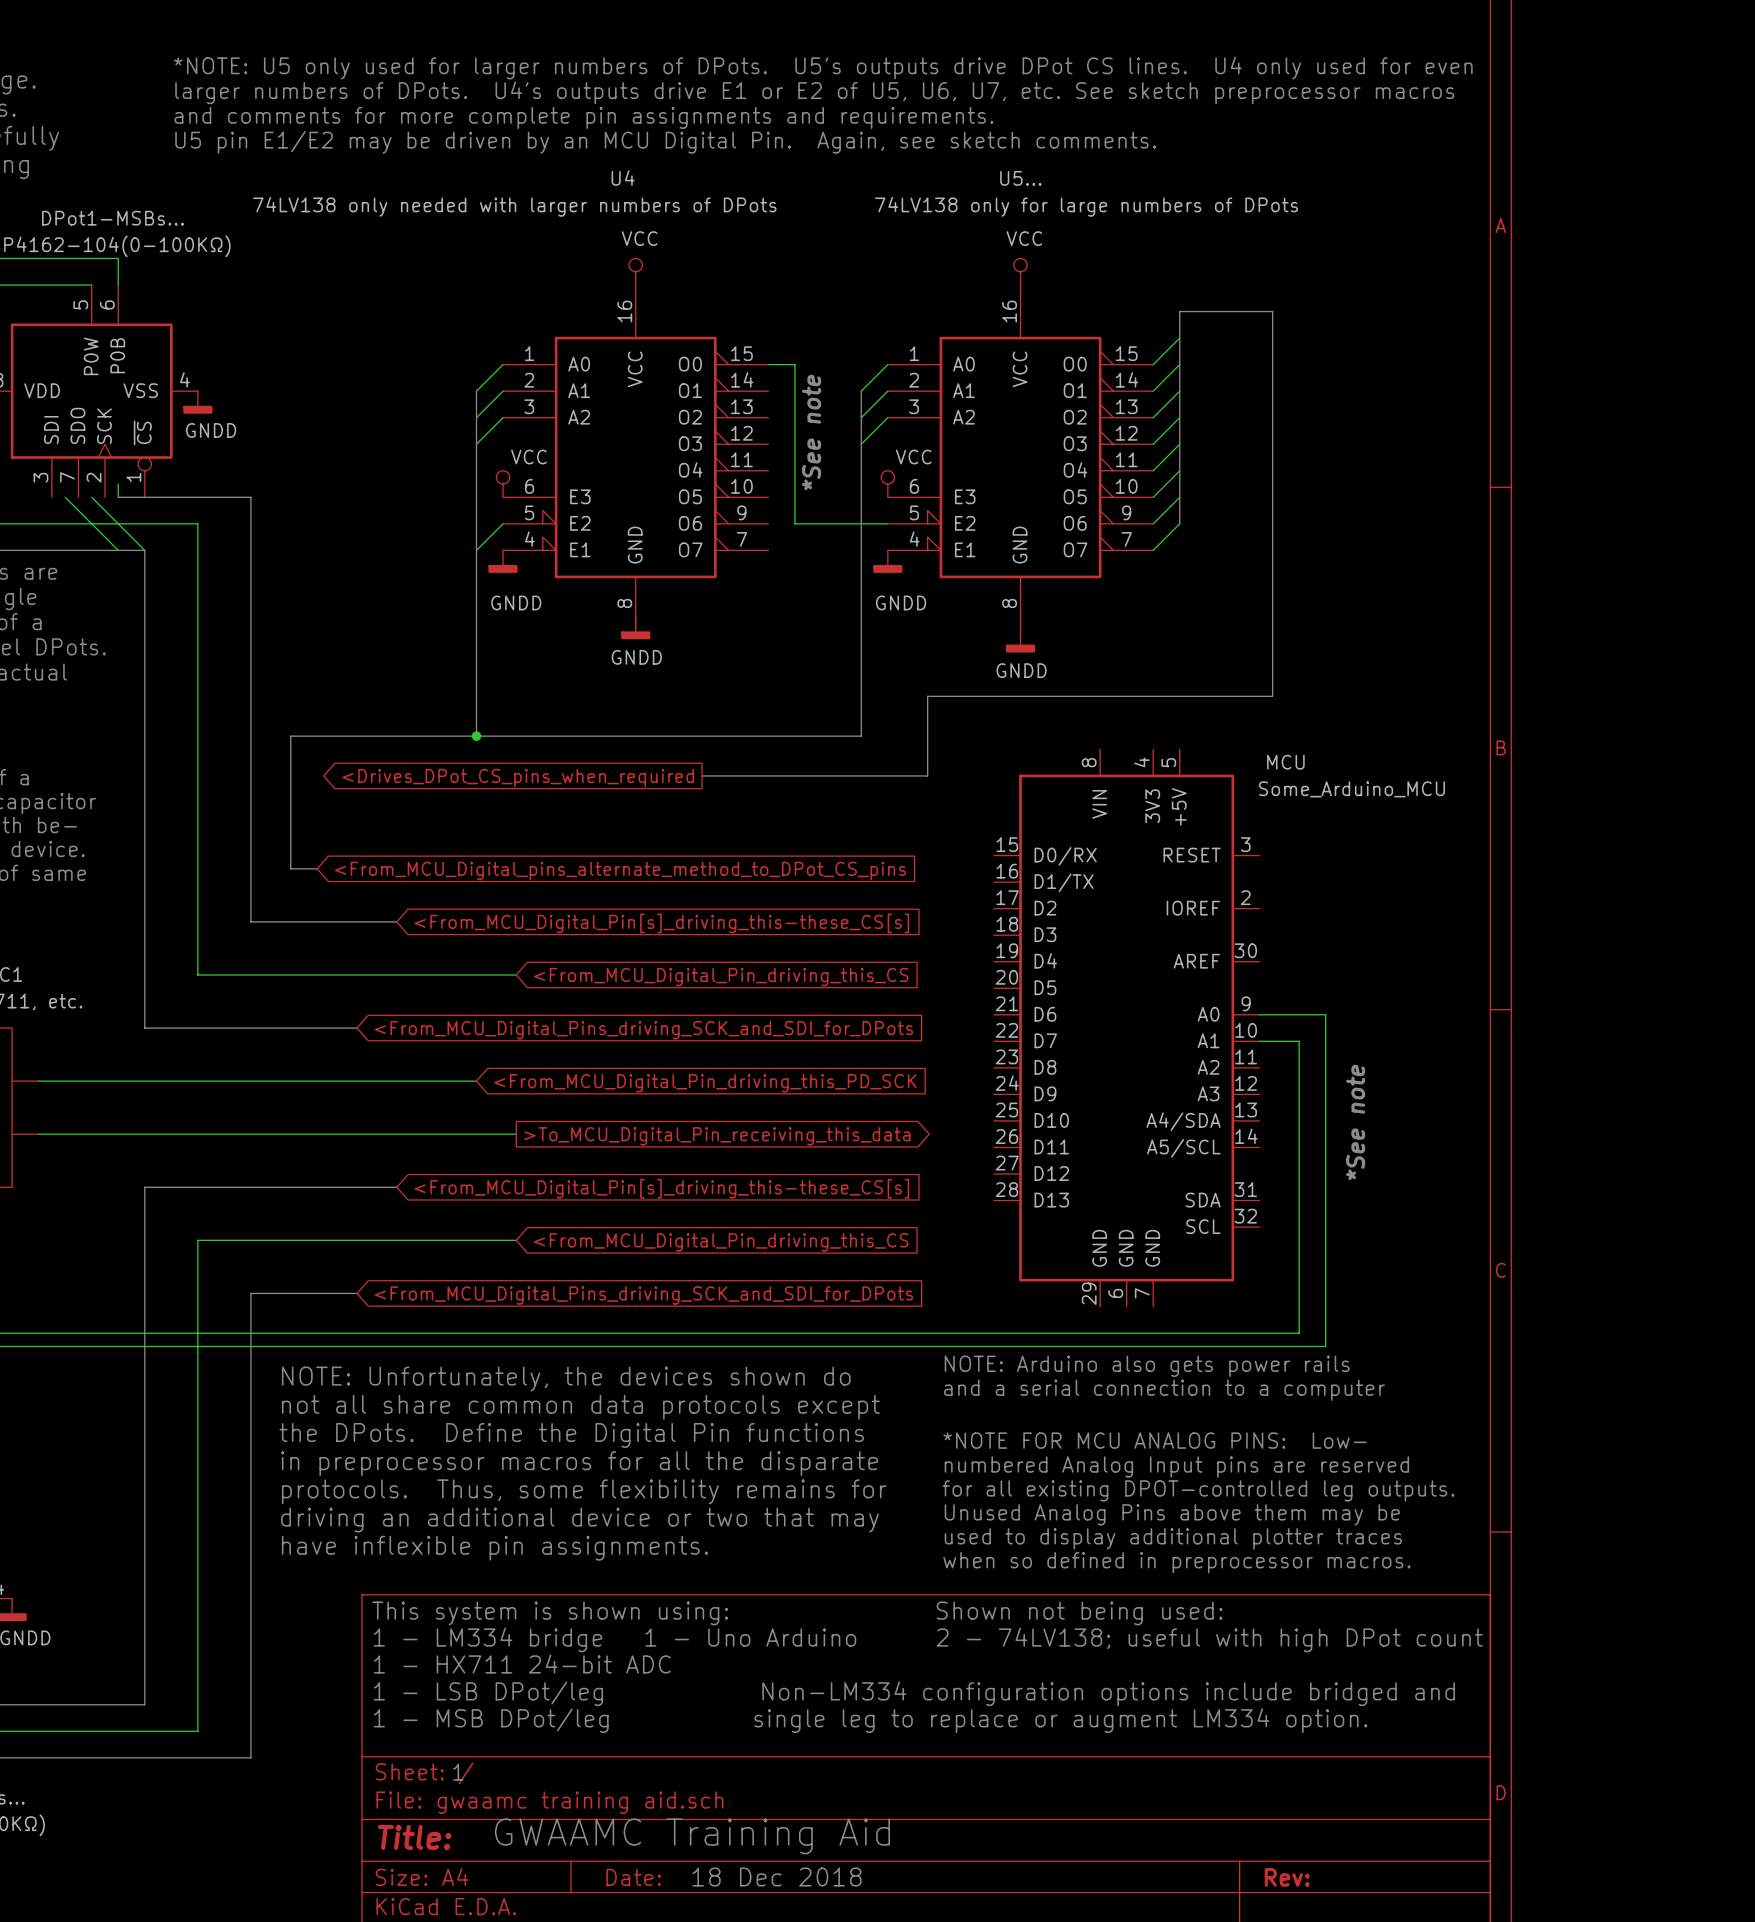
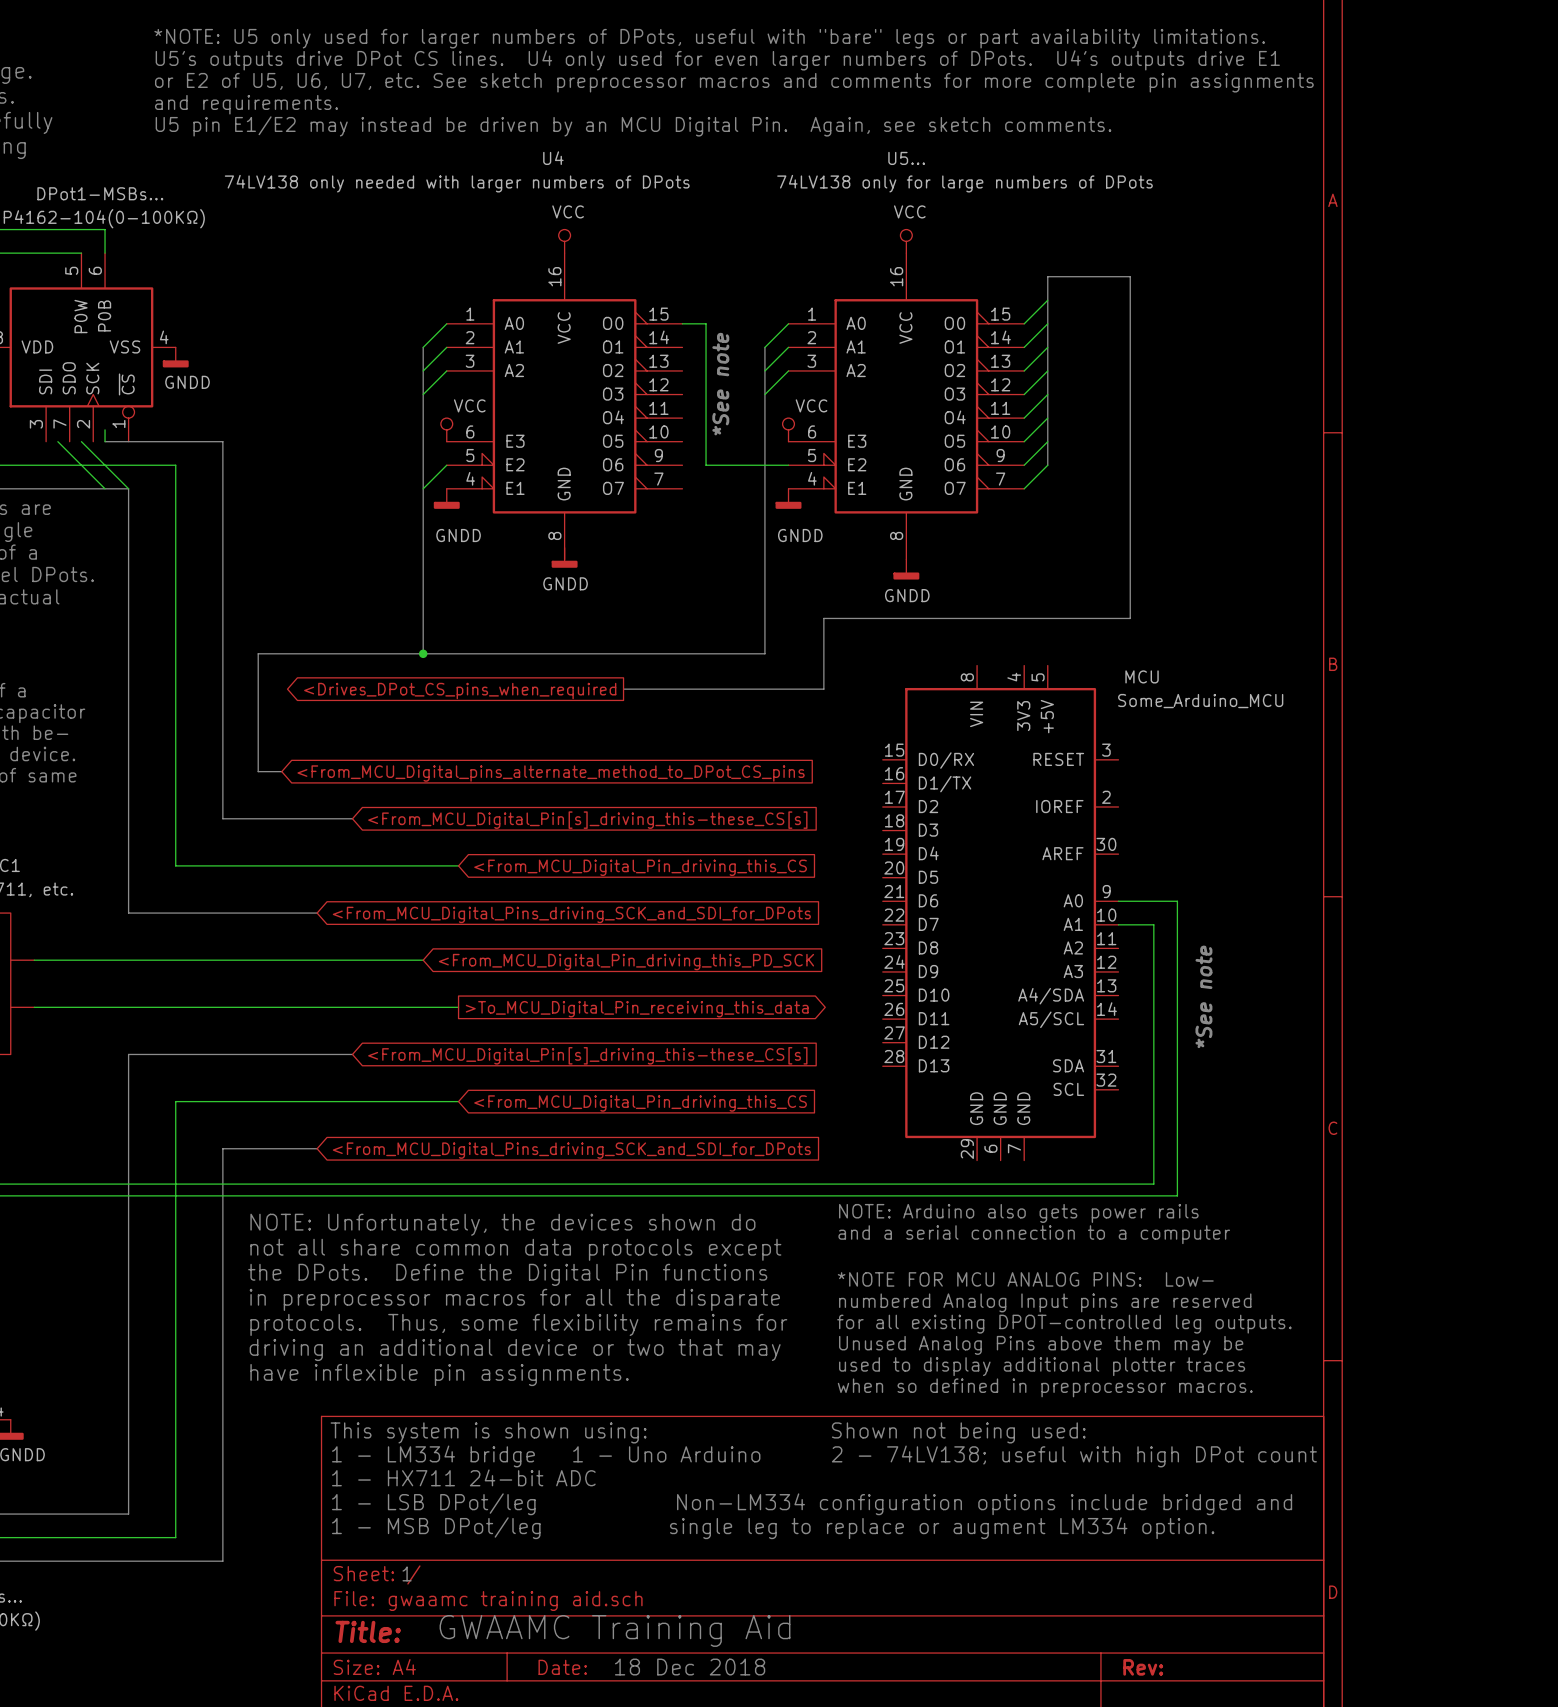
text: none -> *NOTE: U5 only used for larger numbers of DPots, useful with "bare" legs or part availability limitations. (709, 38)
text: *NOTE: U5 only used for larger numbers of DPots. U5's outputs drive DPot CS lines. U4 only used for even (823, 67) -> U5's outputs drive DPot CS lines. U4 only used for even larger numbers of DPots. U4's outputs drive E1 (717, 60)
text: larger numbers of DPots. U4's outputs drive E1 or E2 of U5, U6, U7, etc. See sketch preprocessor macros (814, 92) -> or E2 of U5, U6, U7, etc. See sketch preprocessor macros and comments for more complete pin assignments (734, 82)
text: and comments for more complete pin assignments and requirements. (583, 117) -> and requirements. (246, 104)
text: U5 pin E1/E2 may be driven by an MCU Digital Pin. Again, see sketch comments. (665, 142) -> U5 pin E1/E2 may instead be driven by an MCU Digital Pin. Again, see sketch comments. (633, 126)

